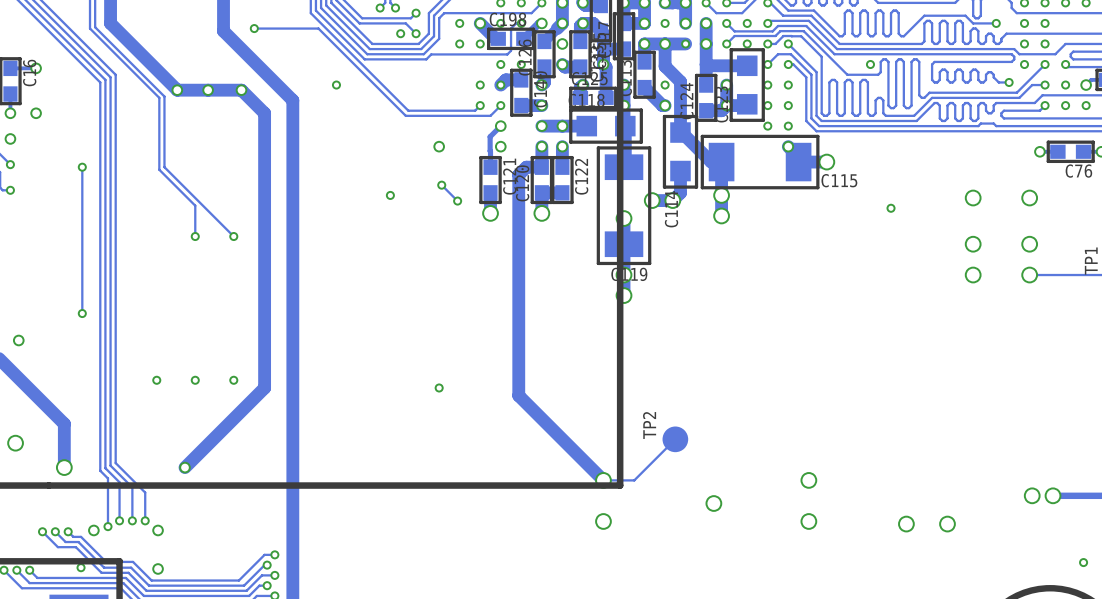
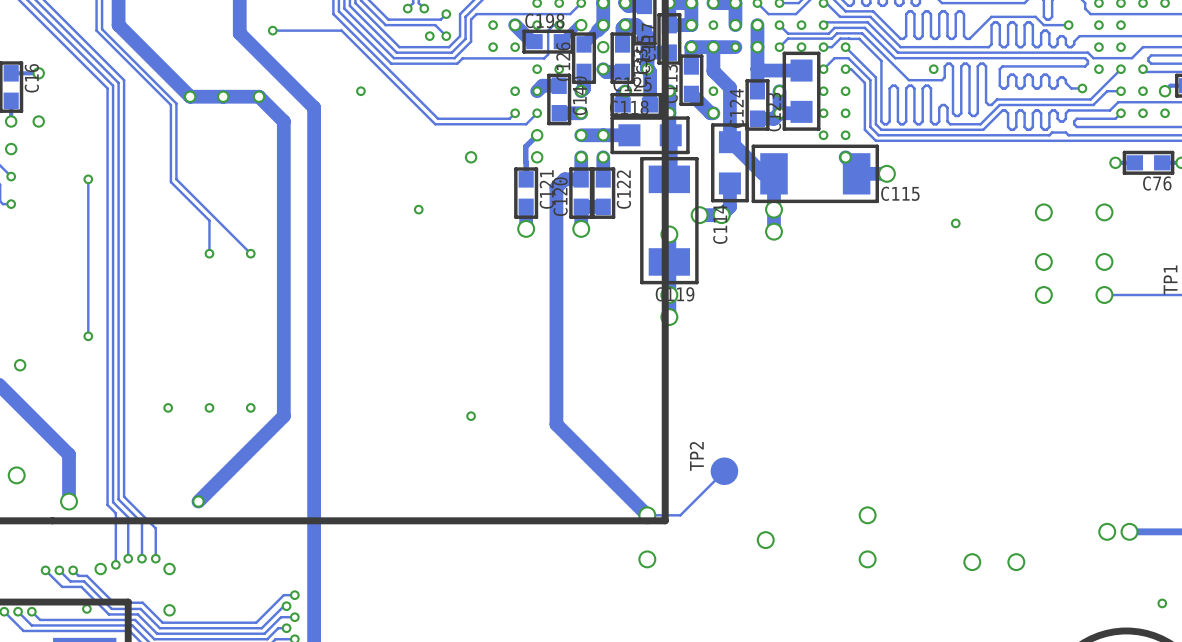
track: (441, 185) (457, 201) -> none
via: (441, 185) -> none
via: (457, 201) -> none

